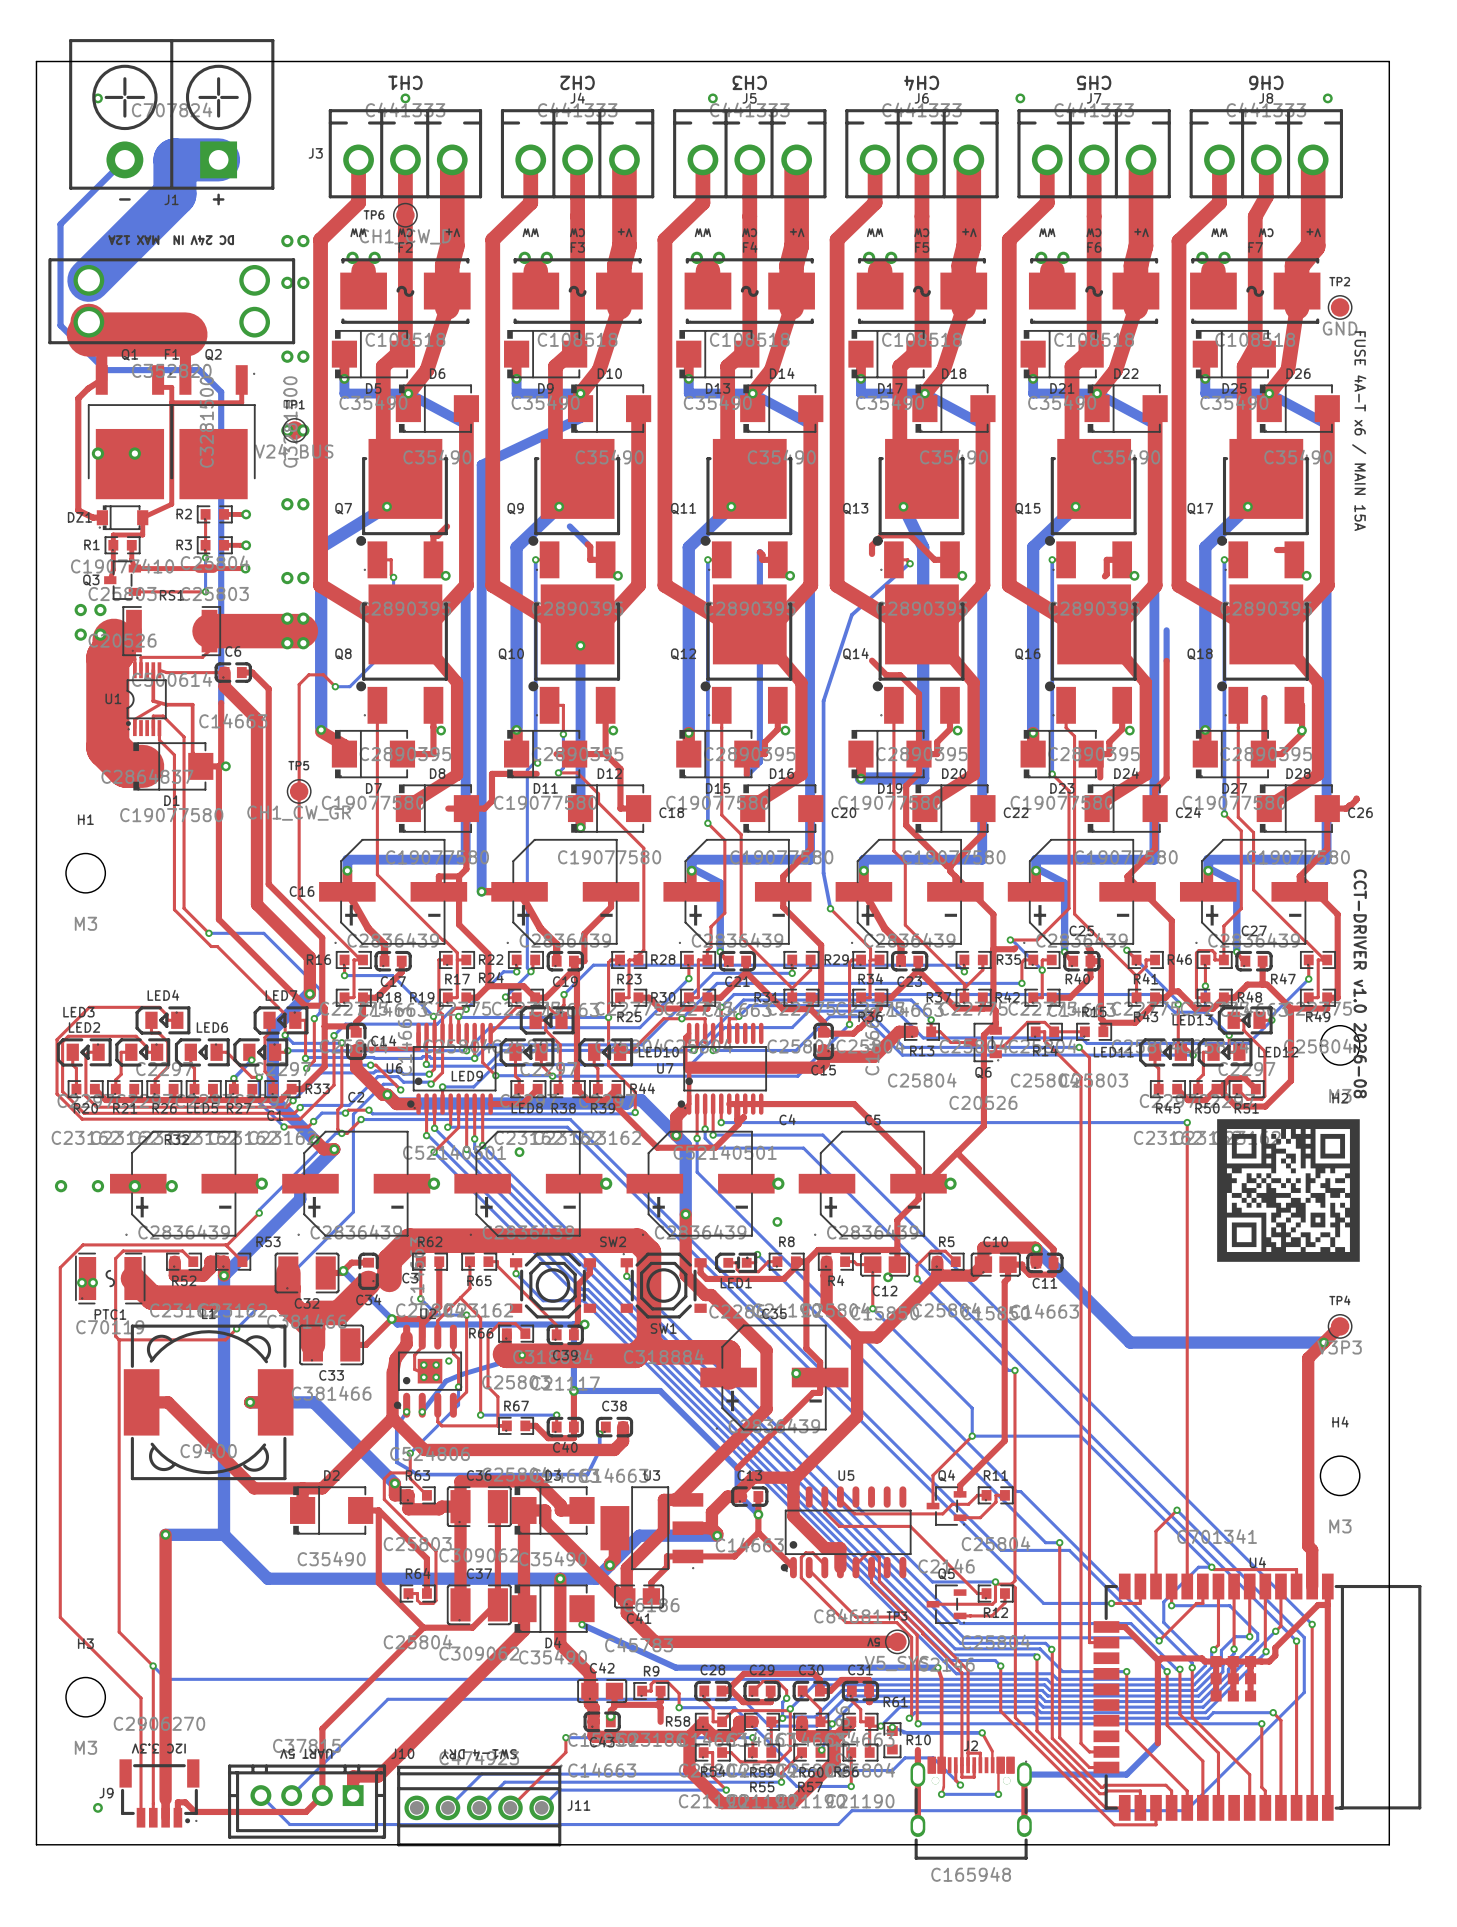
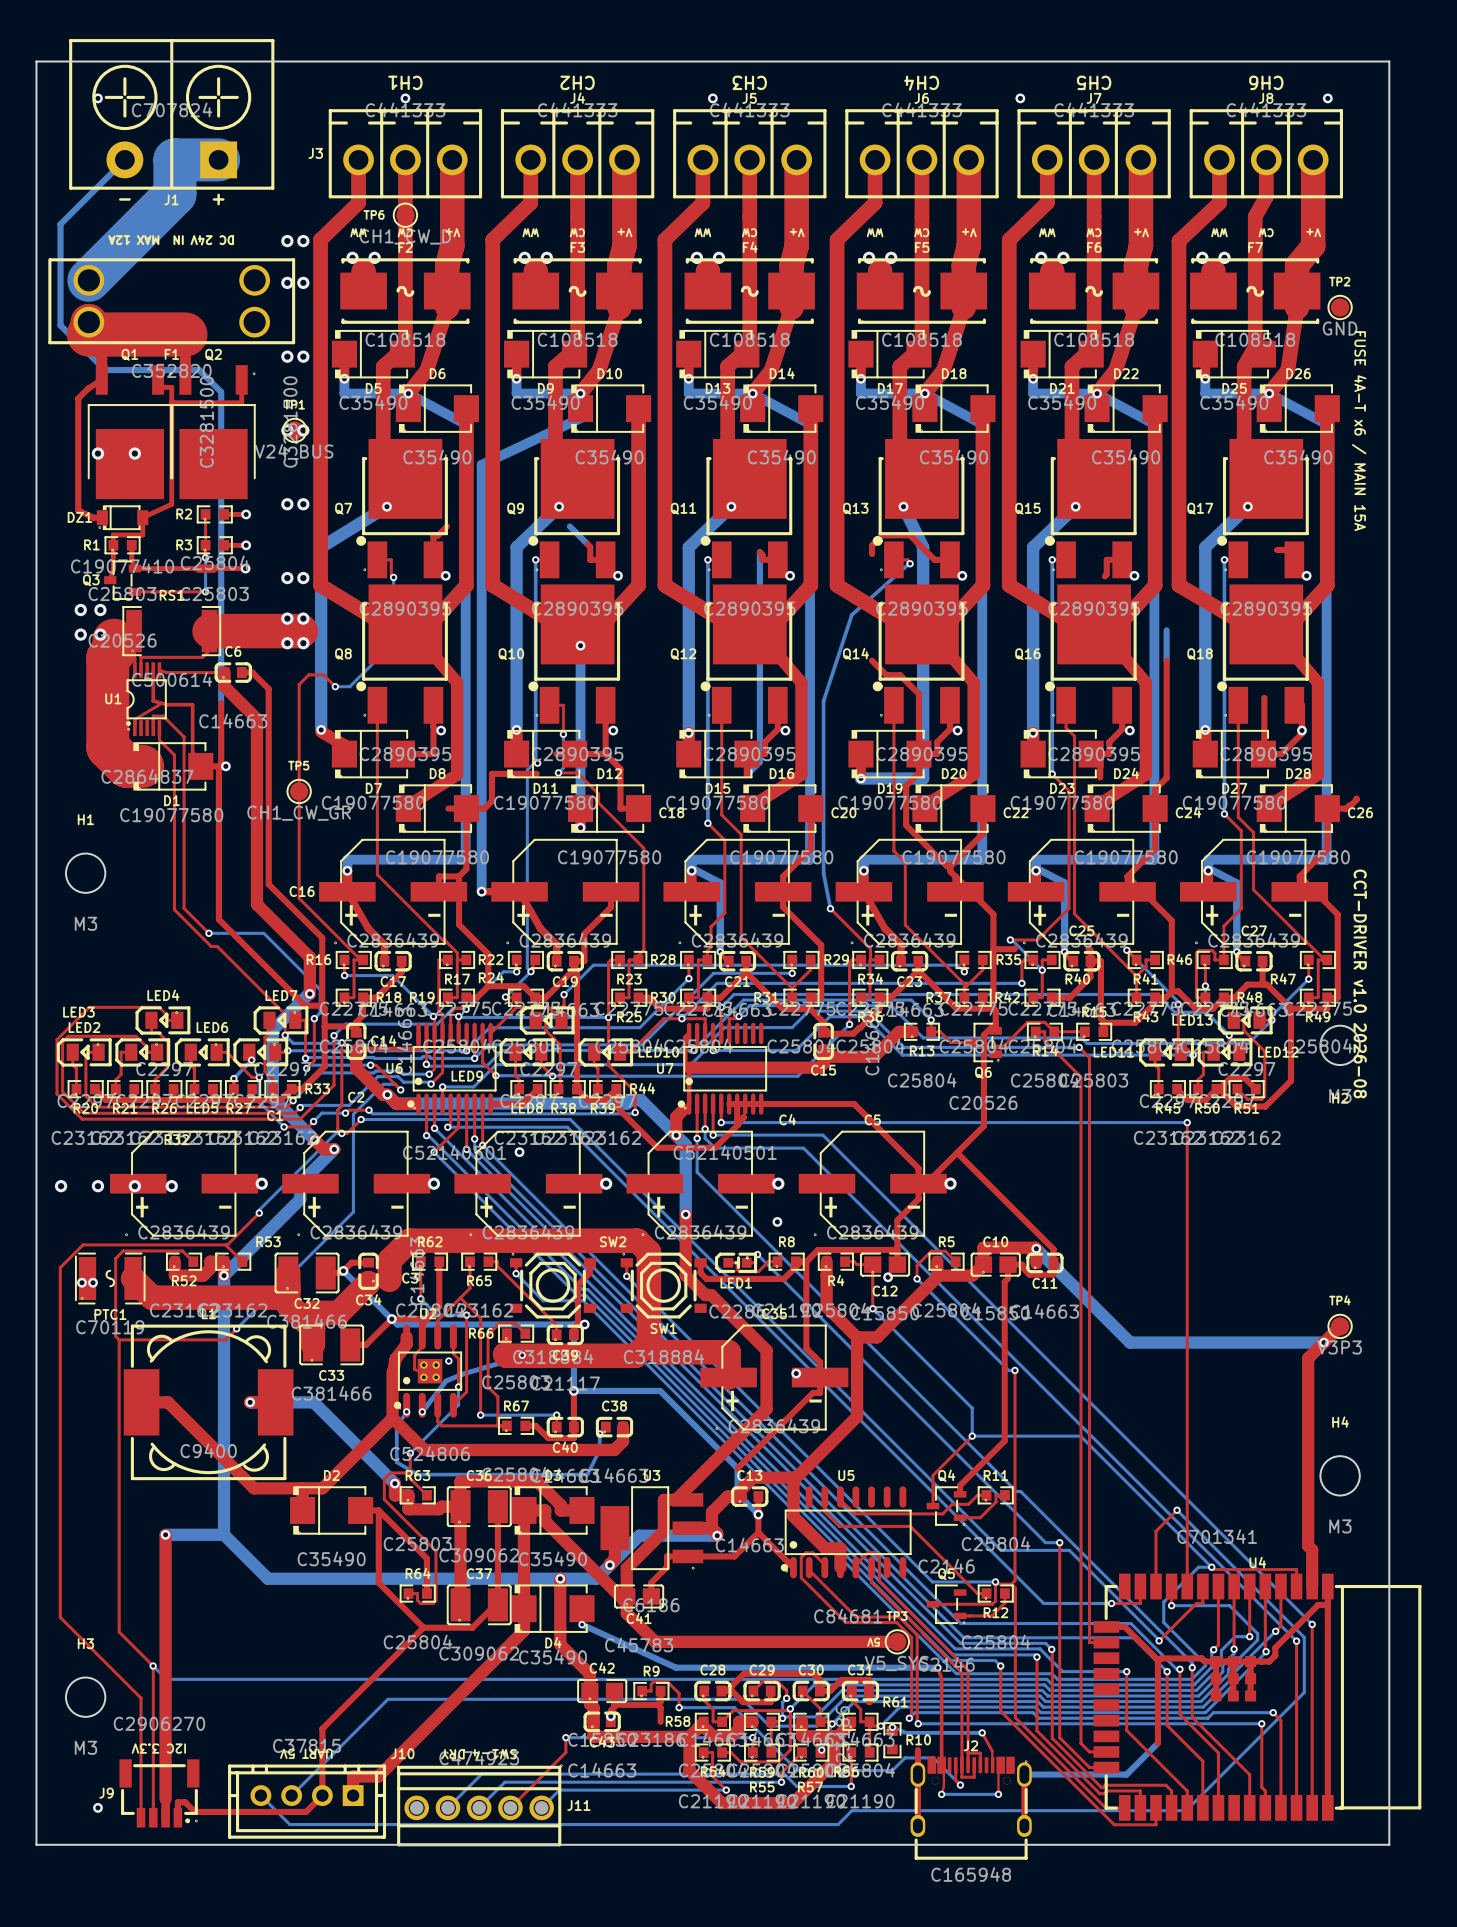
drawing: [1217, 1119, 1360, 1262] -> none

